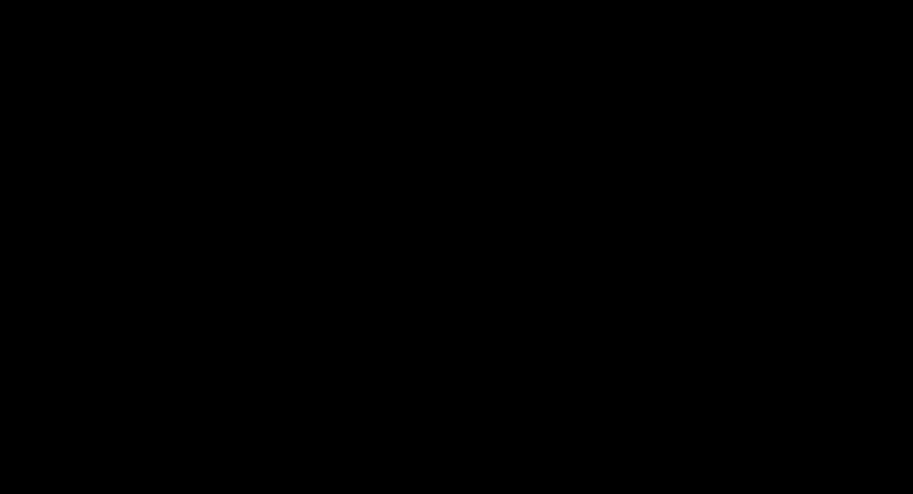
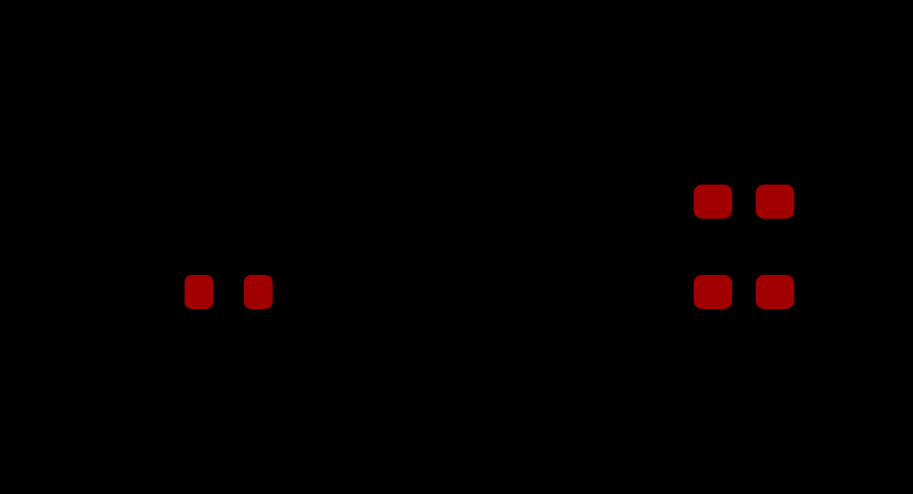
part: none -> (743, 201)
part: none -> (228, 291)
part: none -> (743, 291)

